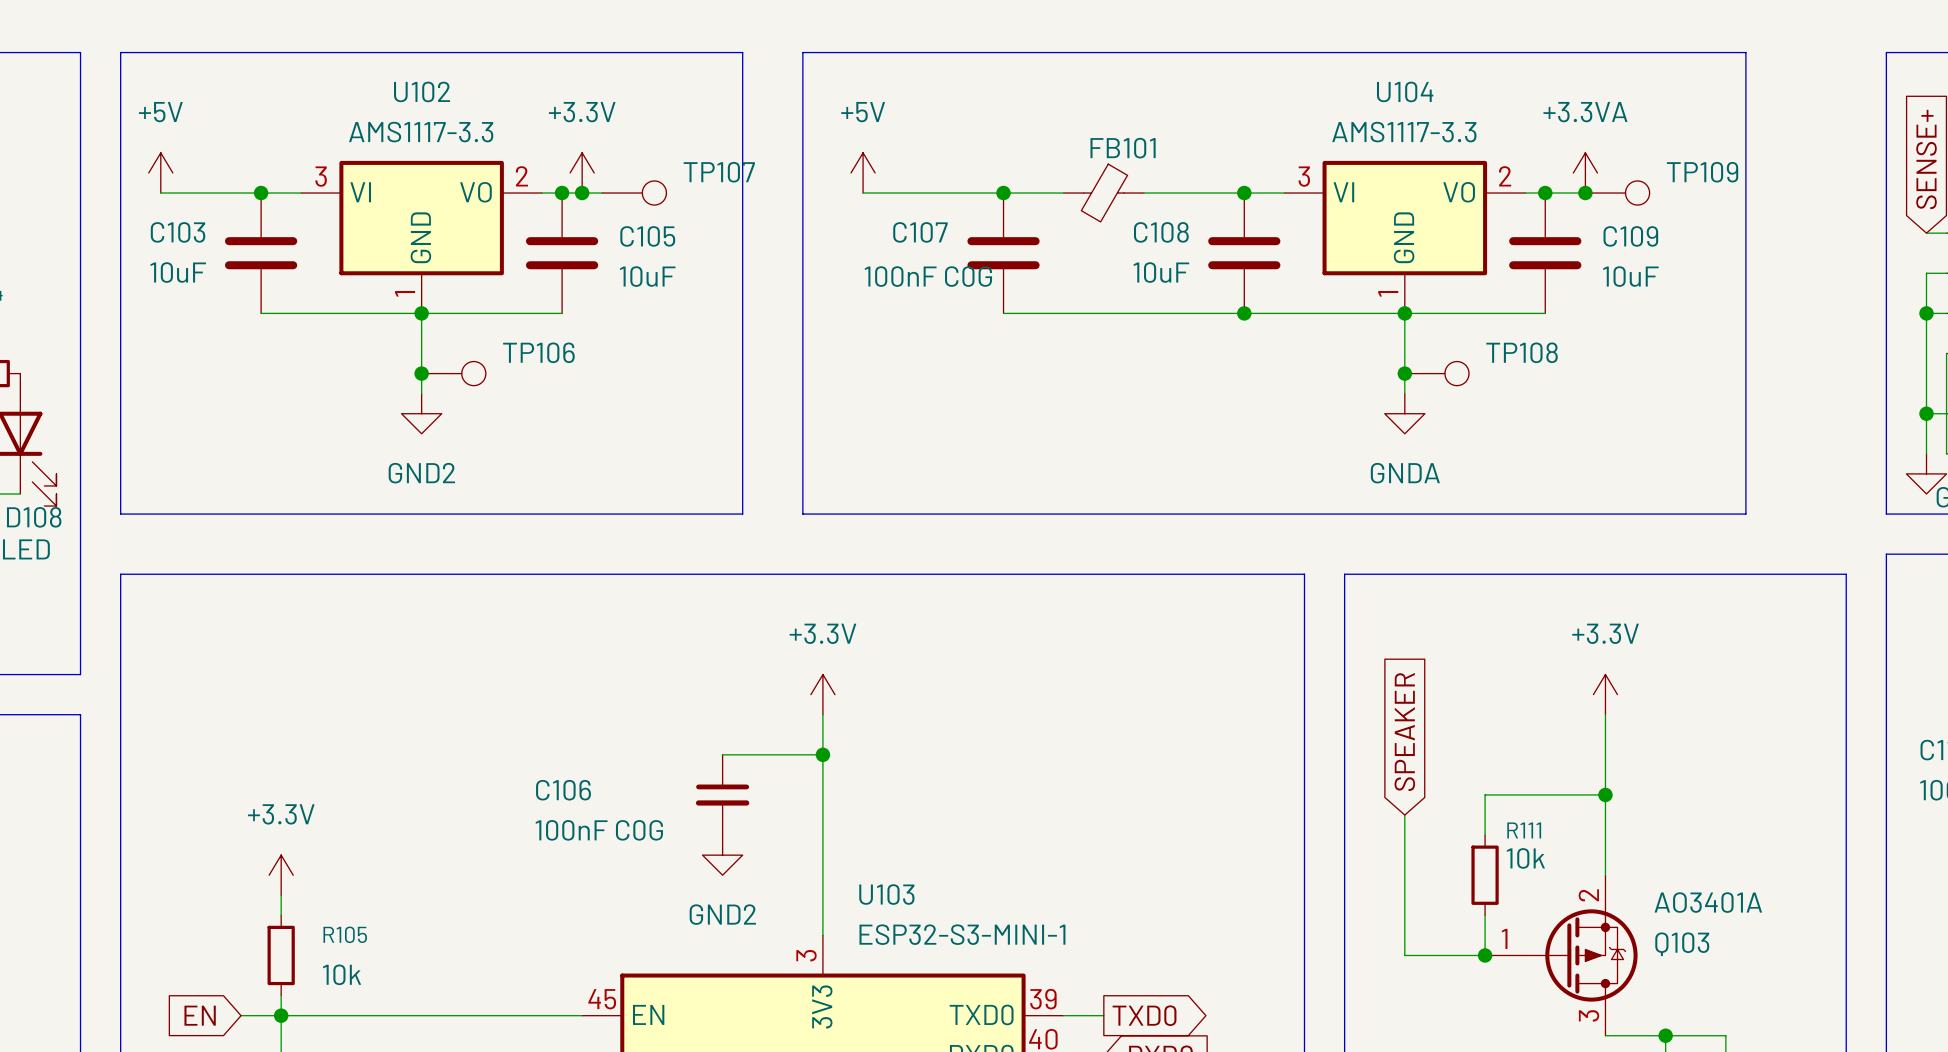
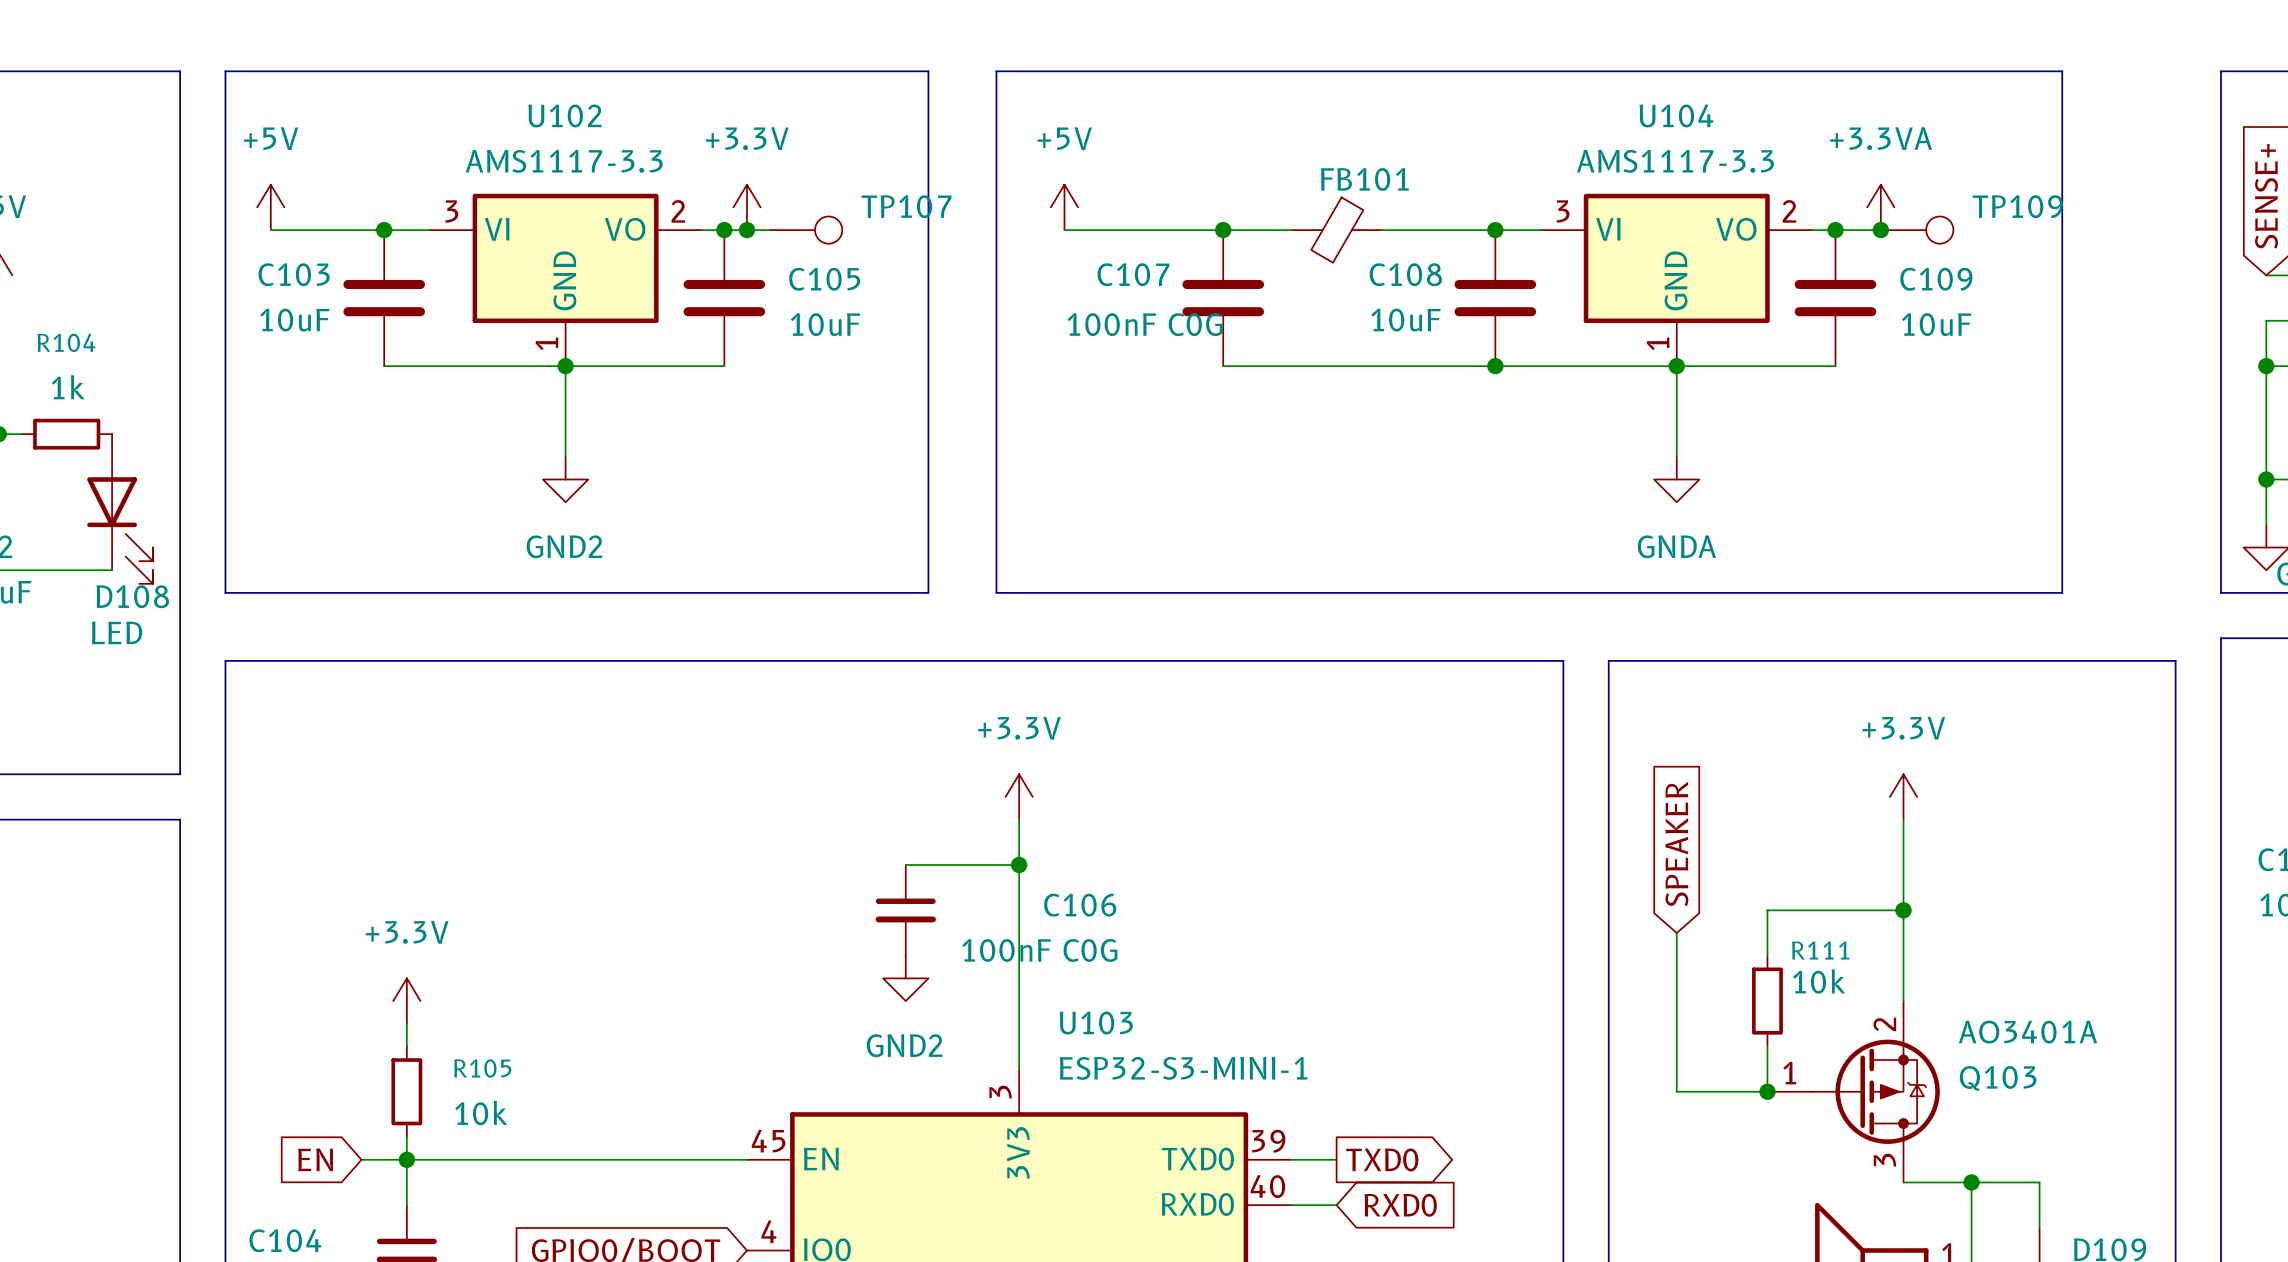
junction: (421, 373) -> none
TP106: (453, 373) -> none
junction: (1404, 373) -> none
TP108: (1436, 373) -> none
C106 name position: C106 (563, 790) -> C106 (1080, 905)
C106 value position: 100nF C0G (599, 830) -> 100nF C0G (1039, 950)

